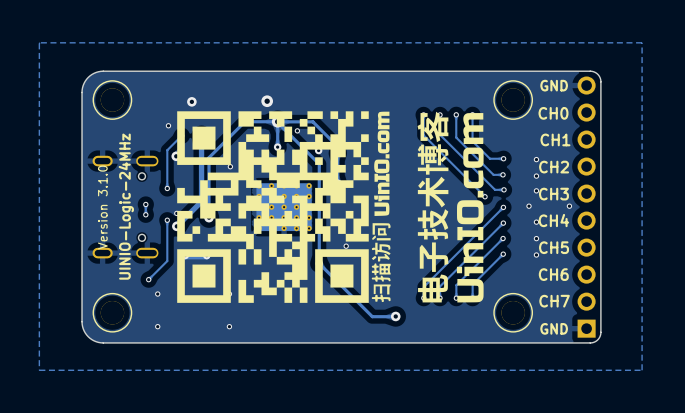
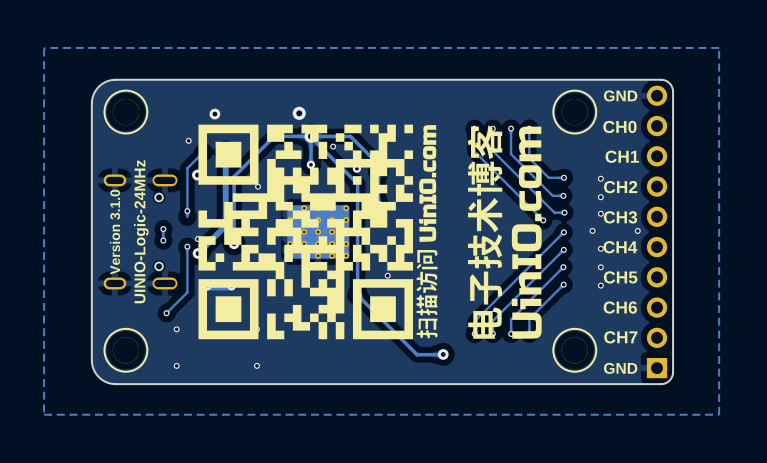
track: none -> (187, 210) (187, 216)

